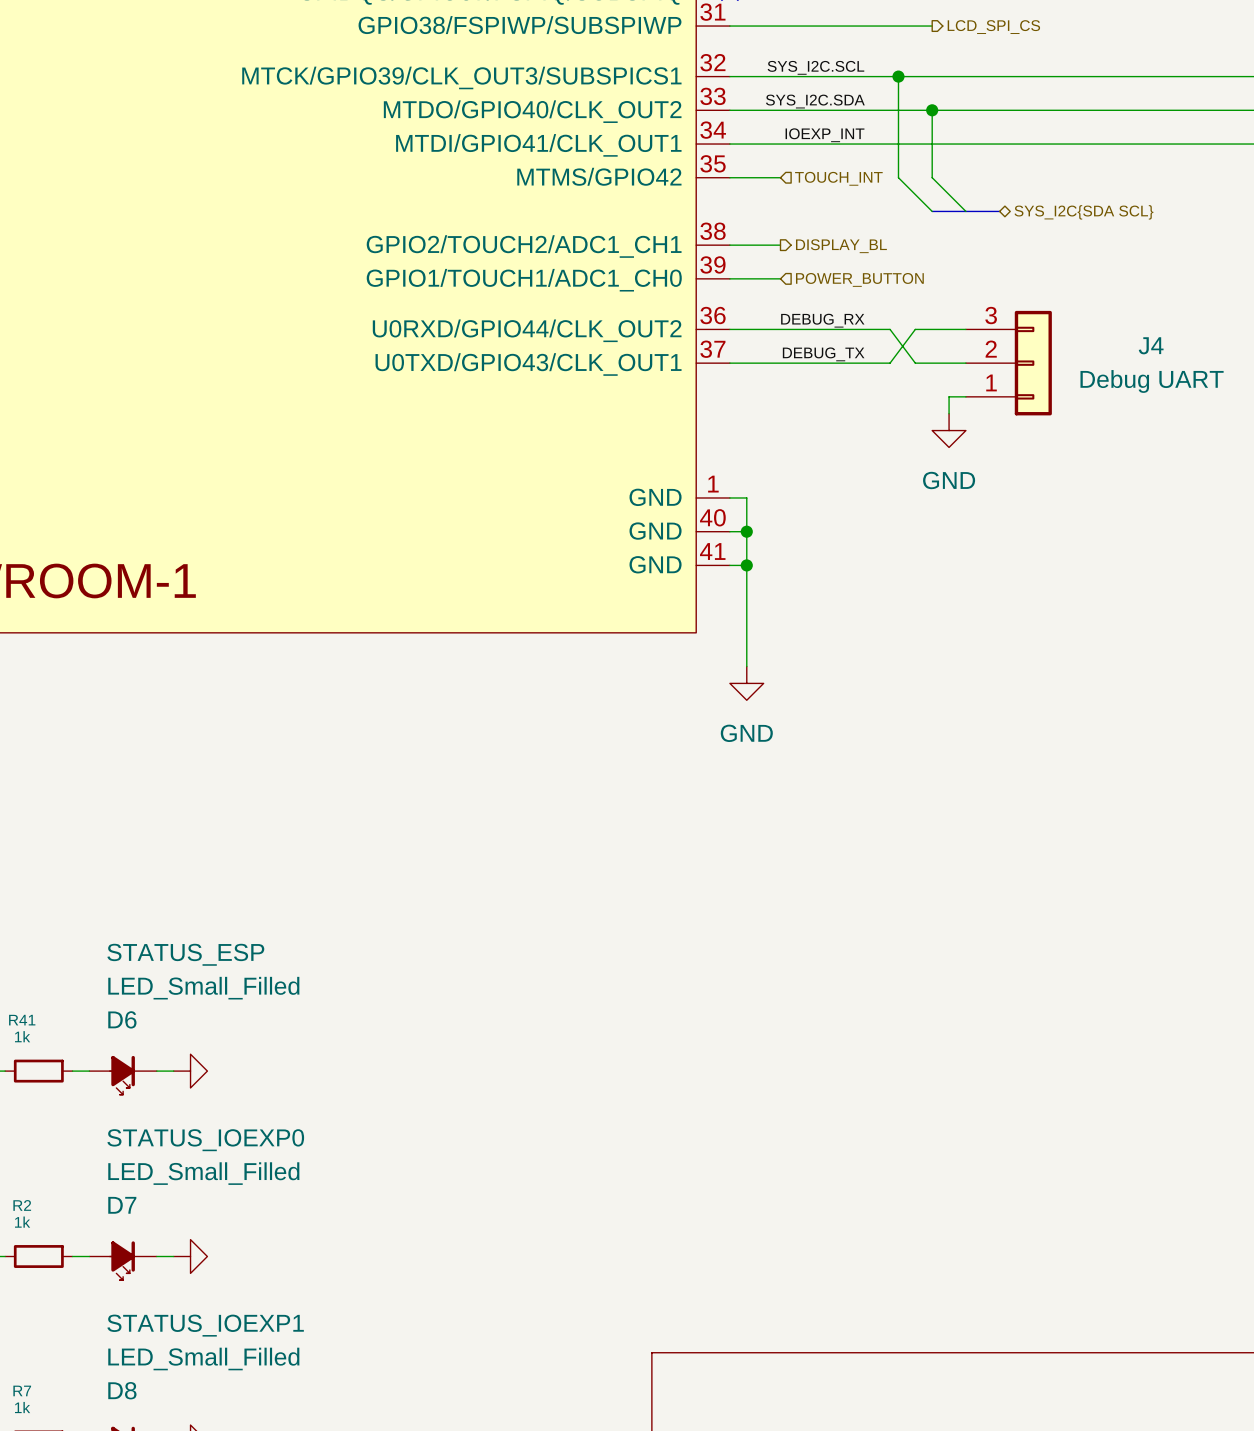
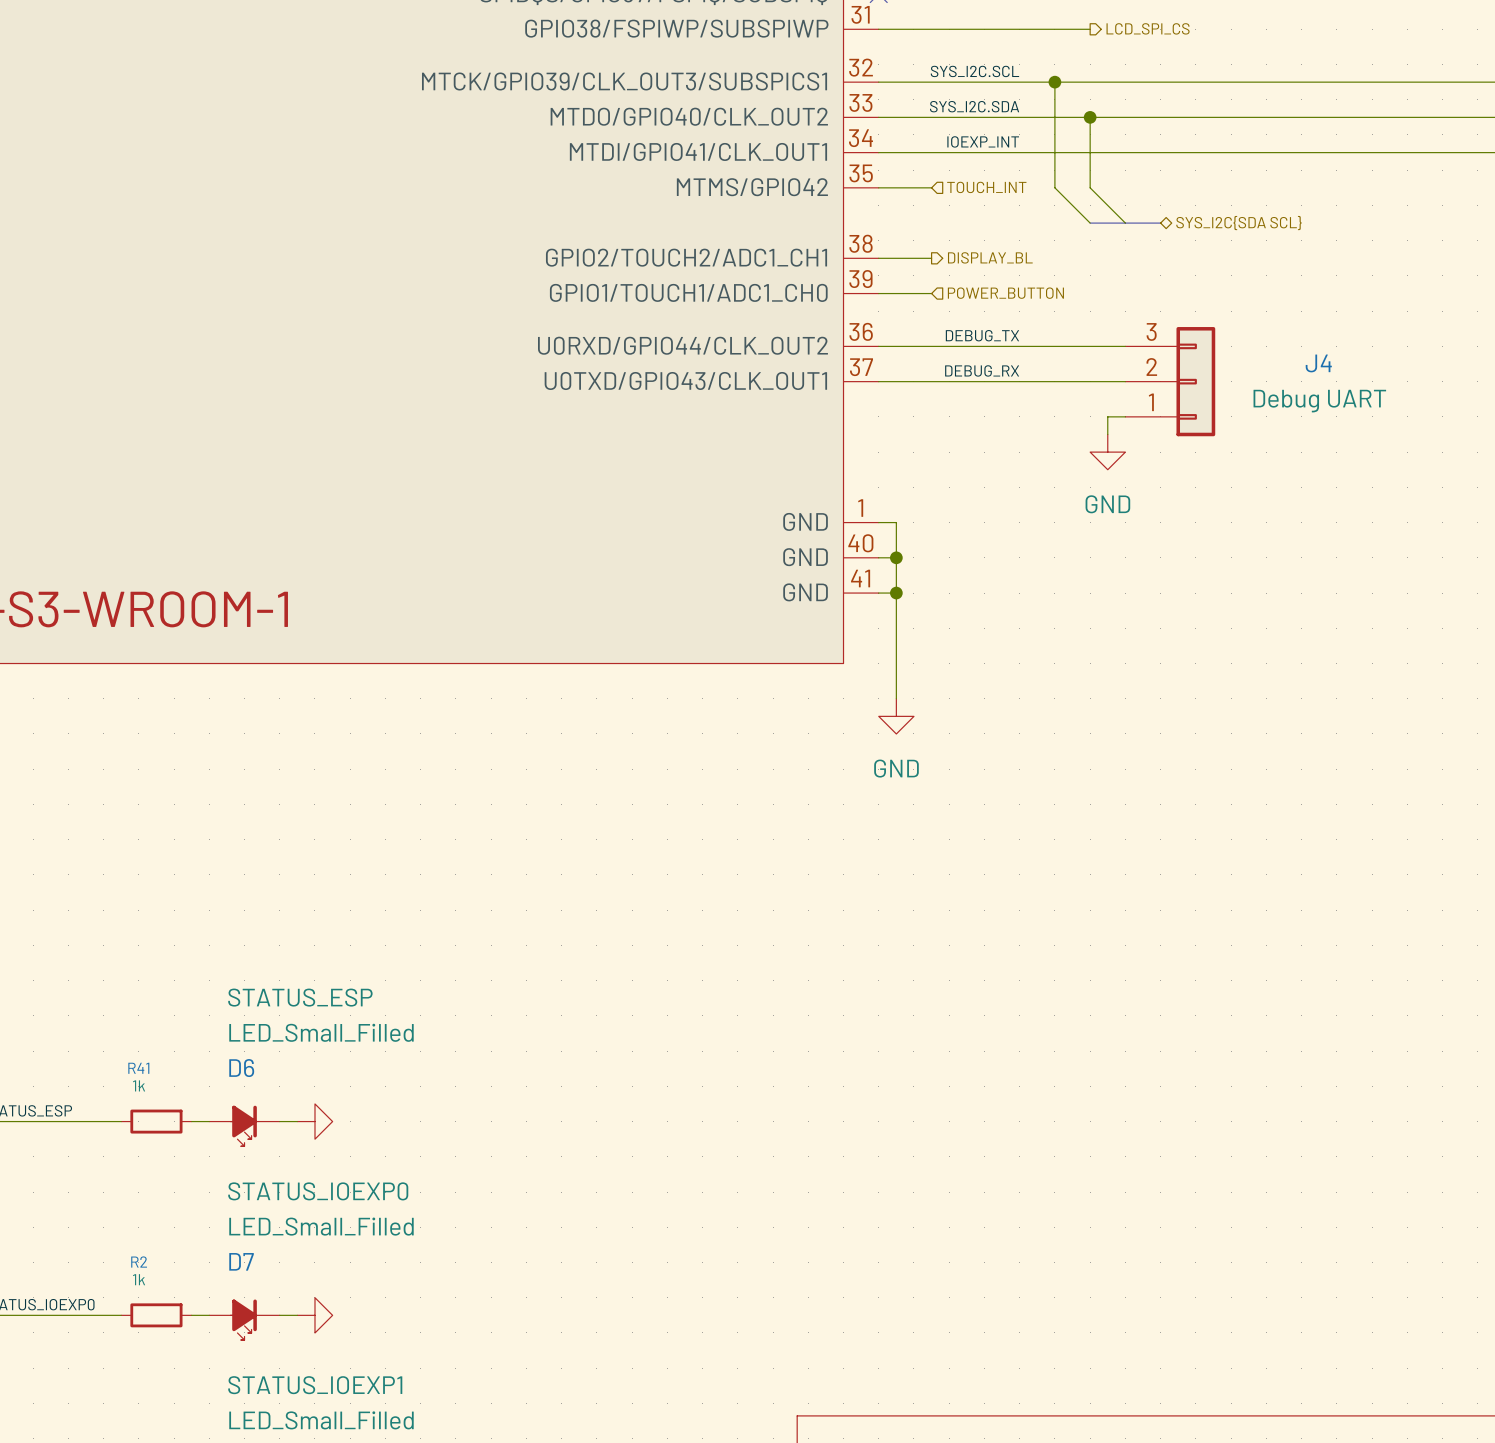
label: DEBUG_RX (822, 320) -> DEBUG_TX (982, 335)
wire: (890, 329) (915, 363) -> (1046, 346) (1072, 346)
wire: (915, 329) (890, 363) -> (1072, 381) (1046, 381)
label: DEBUG_TX (823, 354) -> DEBUG_RX (982, 370)

